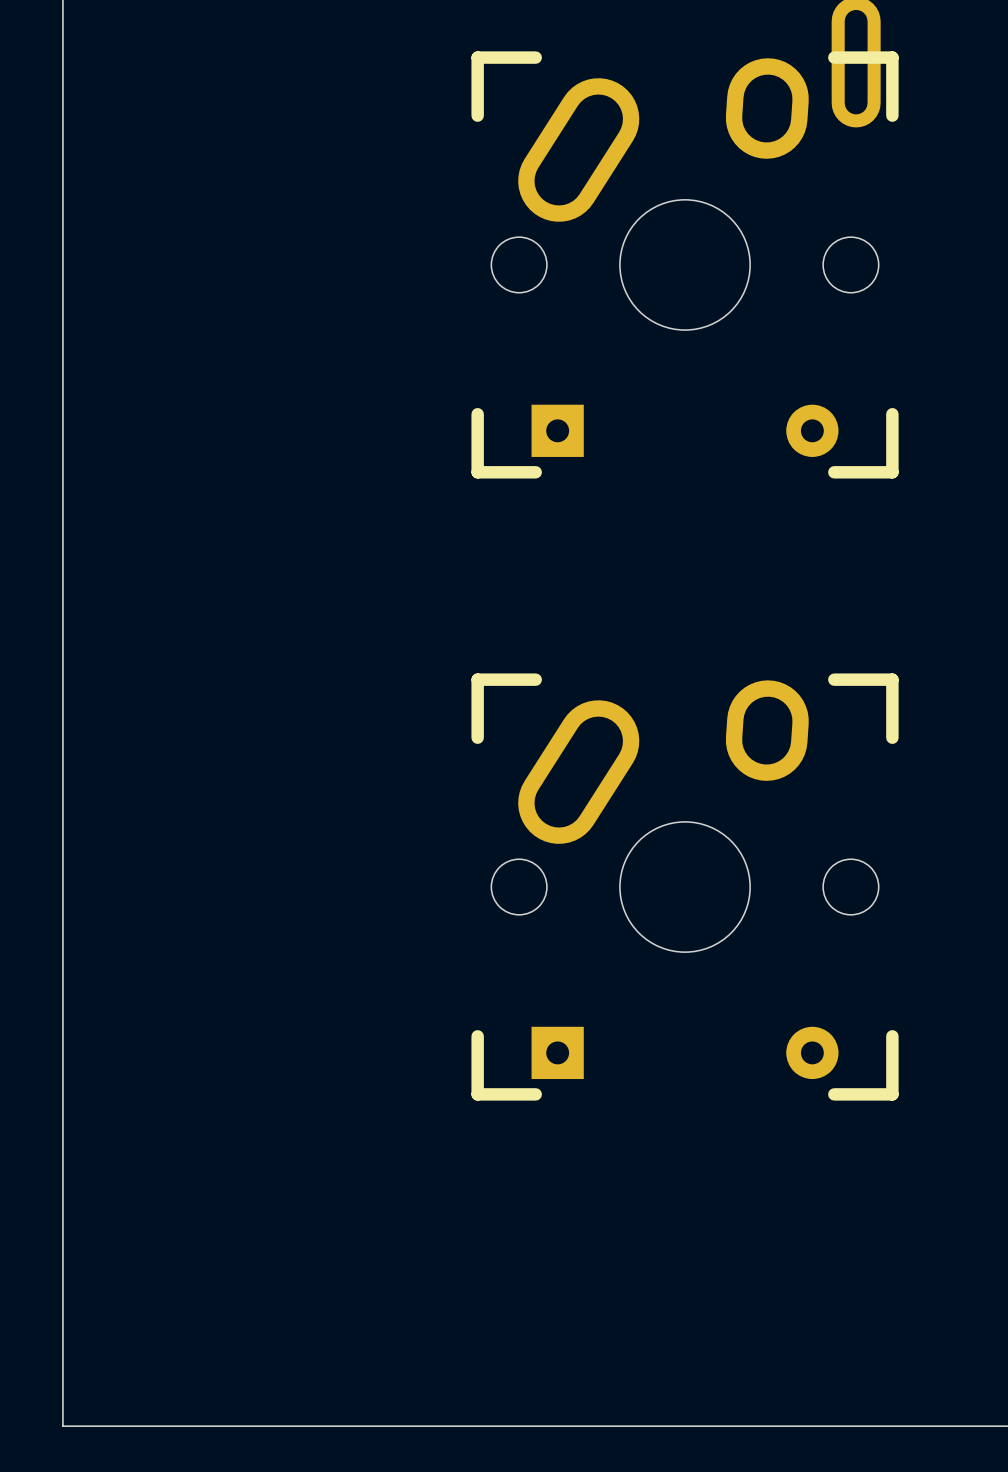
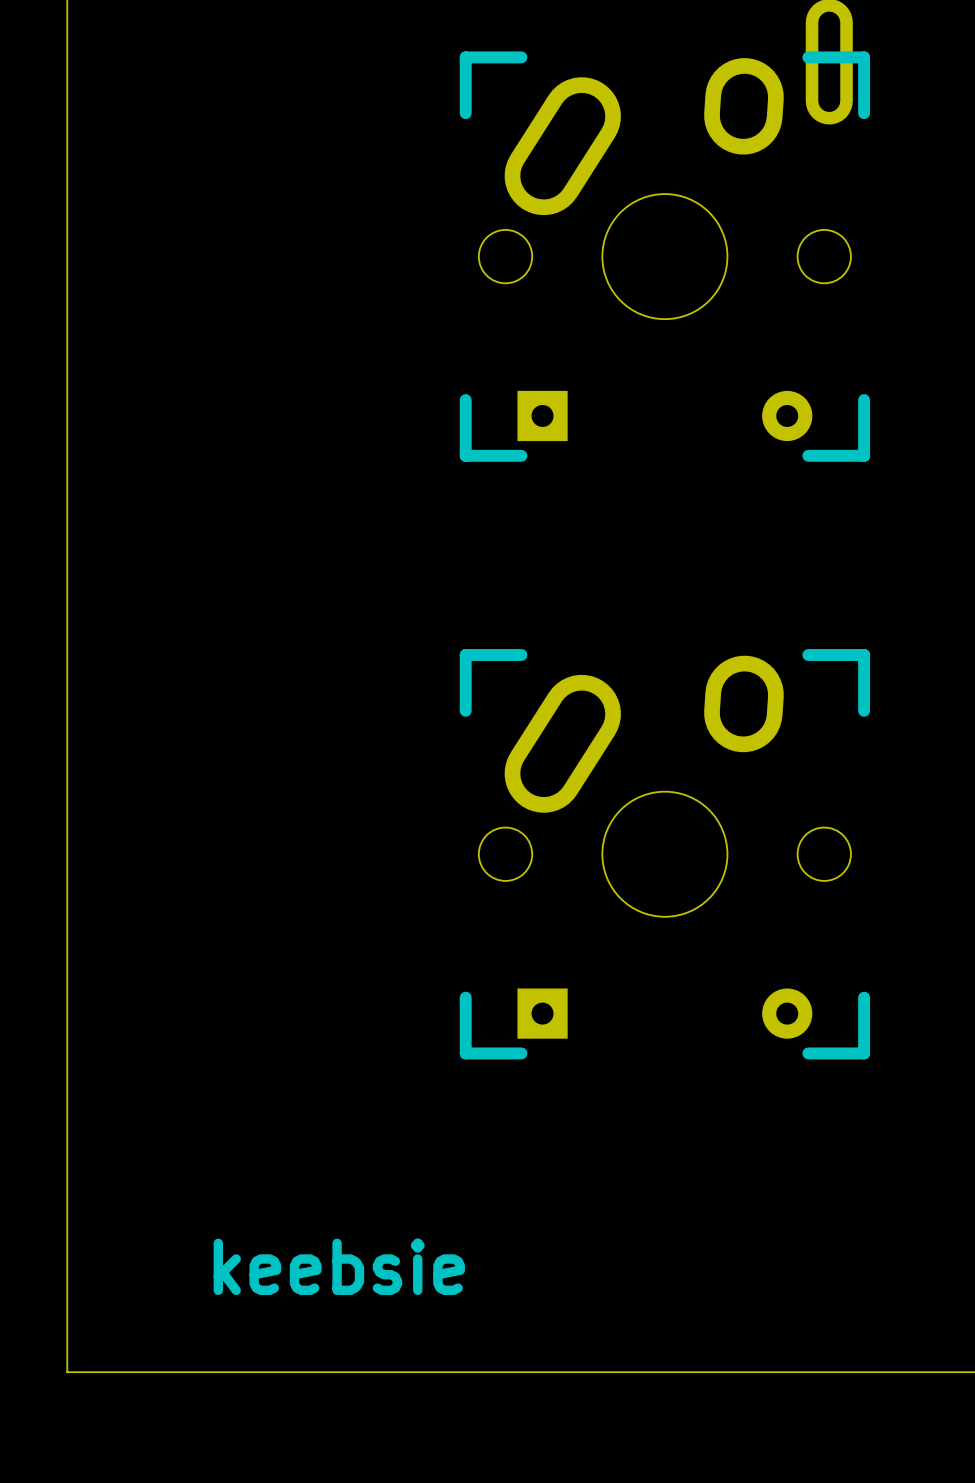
text: none -> keebsie (339, 1266)

